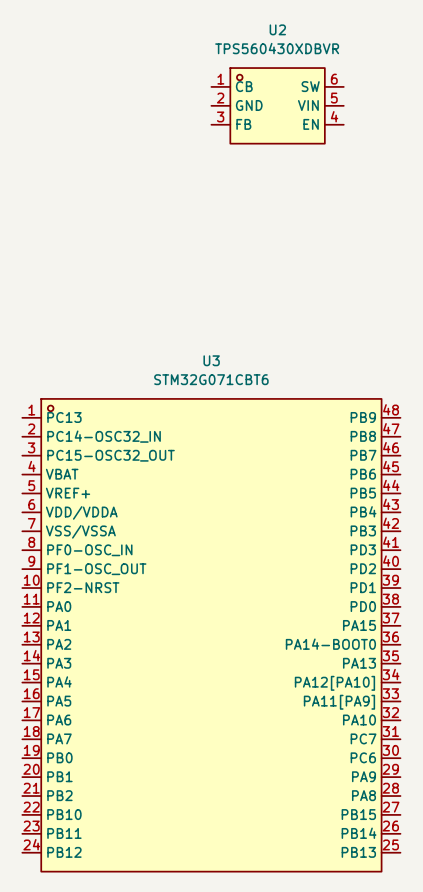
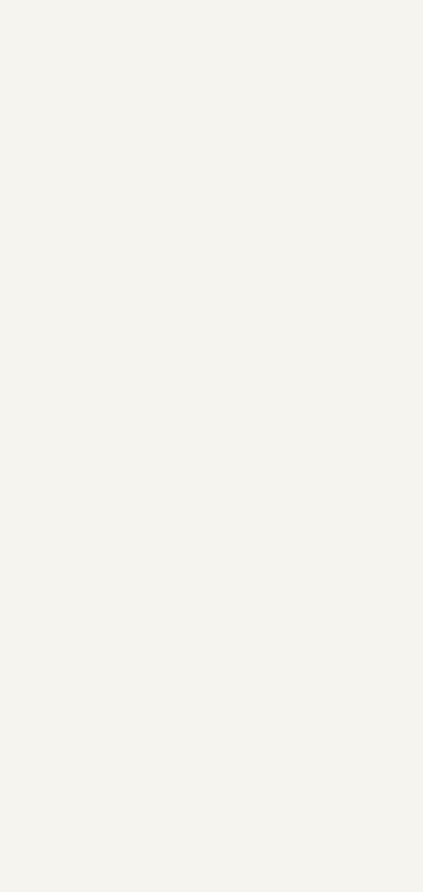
U2: TPS560430XDBVR (277, 105) -> none
U3: STM32G071CBT6 (211, 635) -> none

